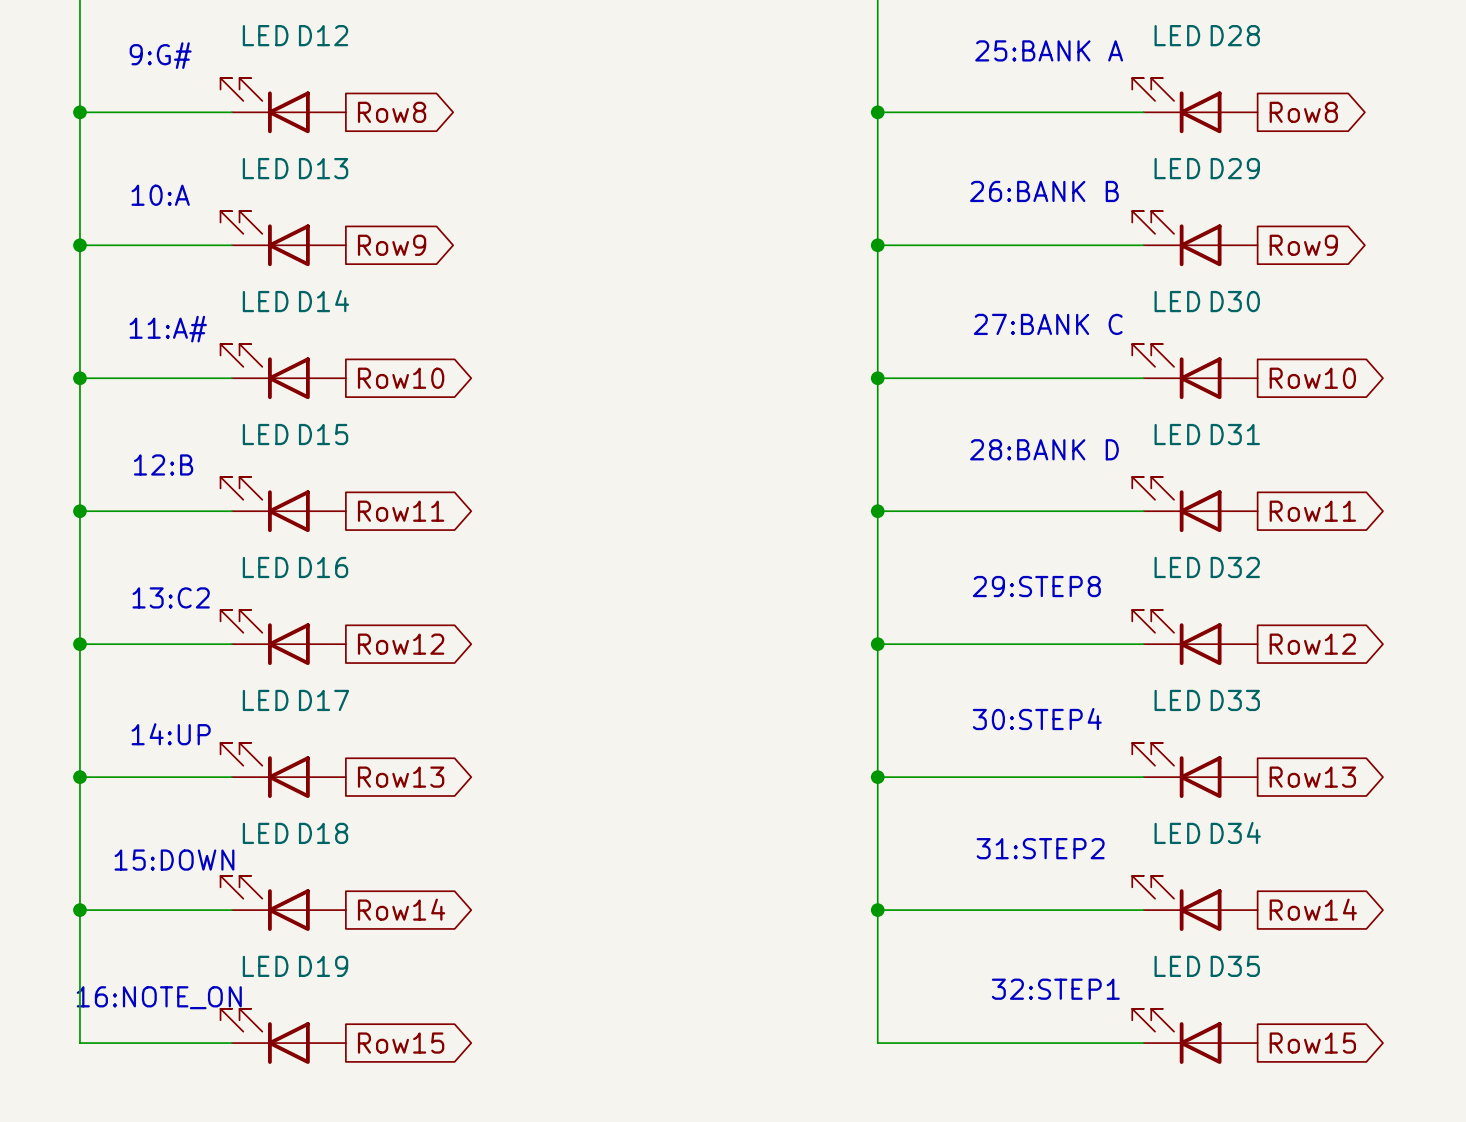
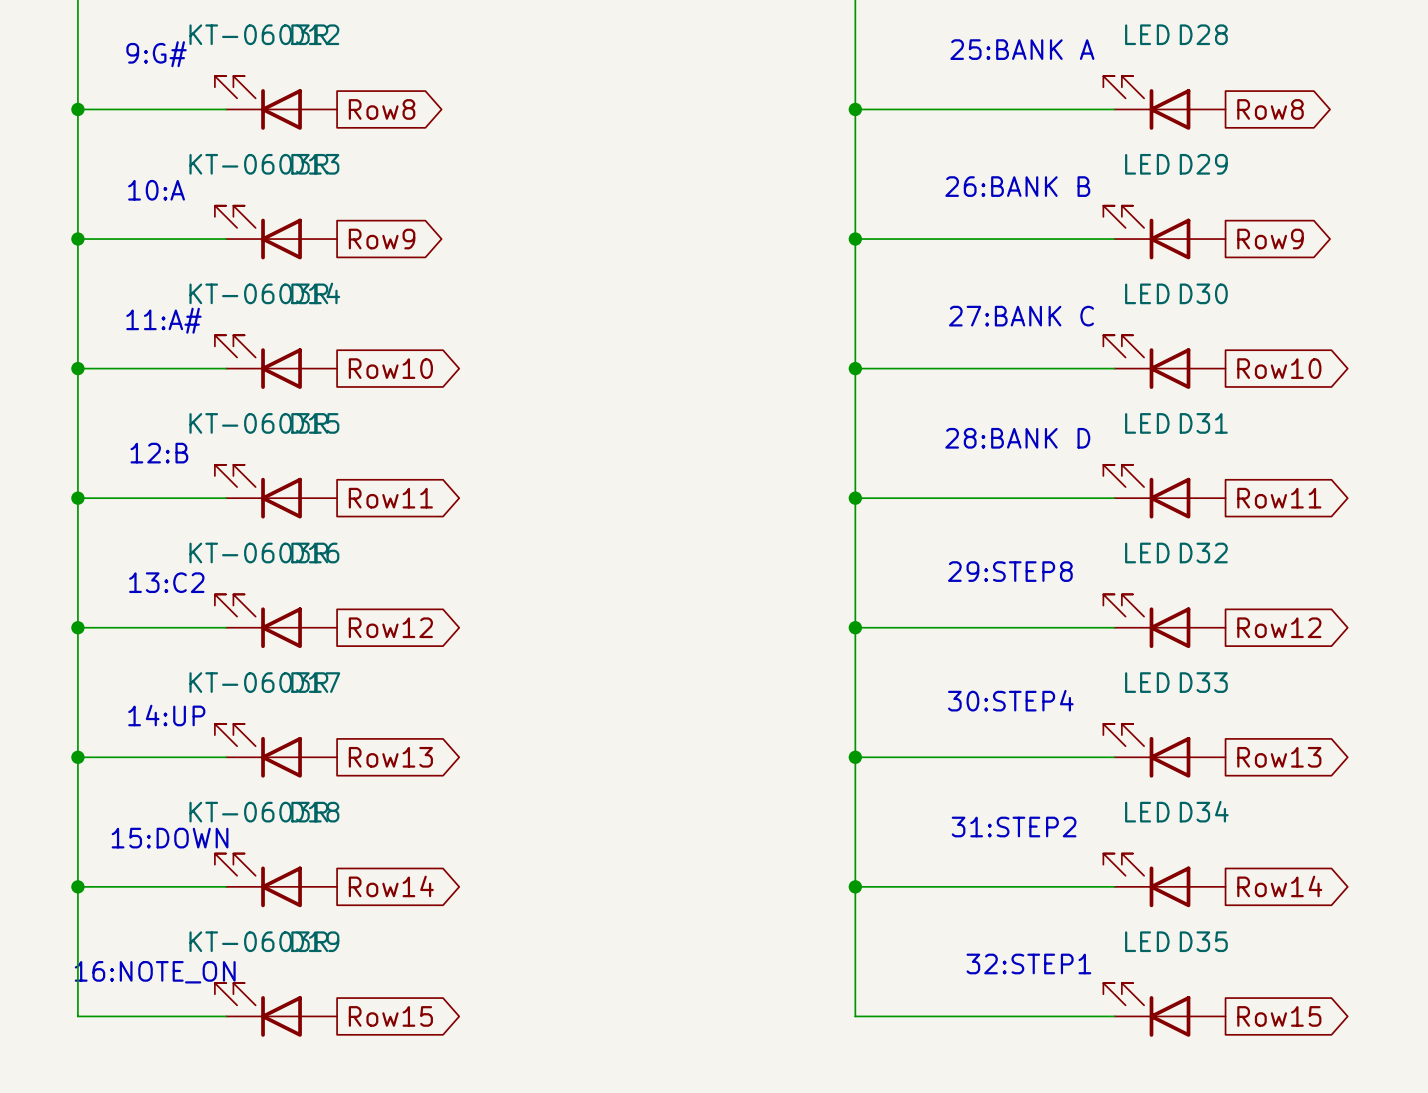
D12 value: LED (265, 35) -> KT-0603R (258, 34)
D13 value: LED (265, 168) -> KT-0603R (258, 164)
D14 value: LED (265, 301) -> KT-0603R (258, 293)
D15 value: LED (265, 434) -> KT-0603R (258, 423)
D16 value: LED (265, 567) -> KT-0603R (258, 553)
D17 value: LED (265, 700) -> KT-0603R (258, 682)
D18 value: LED (265, 833) -> KT-0603R (258, 812)
D19 value: LED (265, 966) -> KT-0603R (258, 941)

